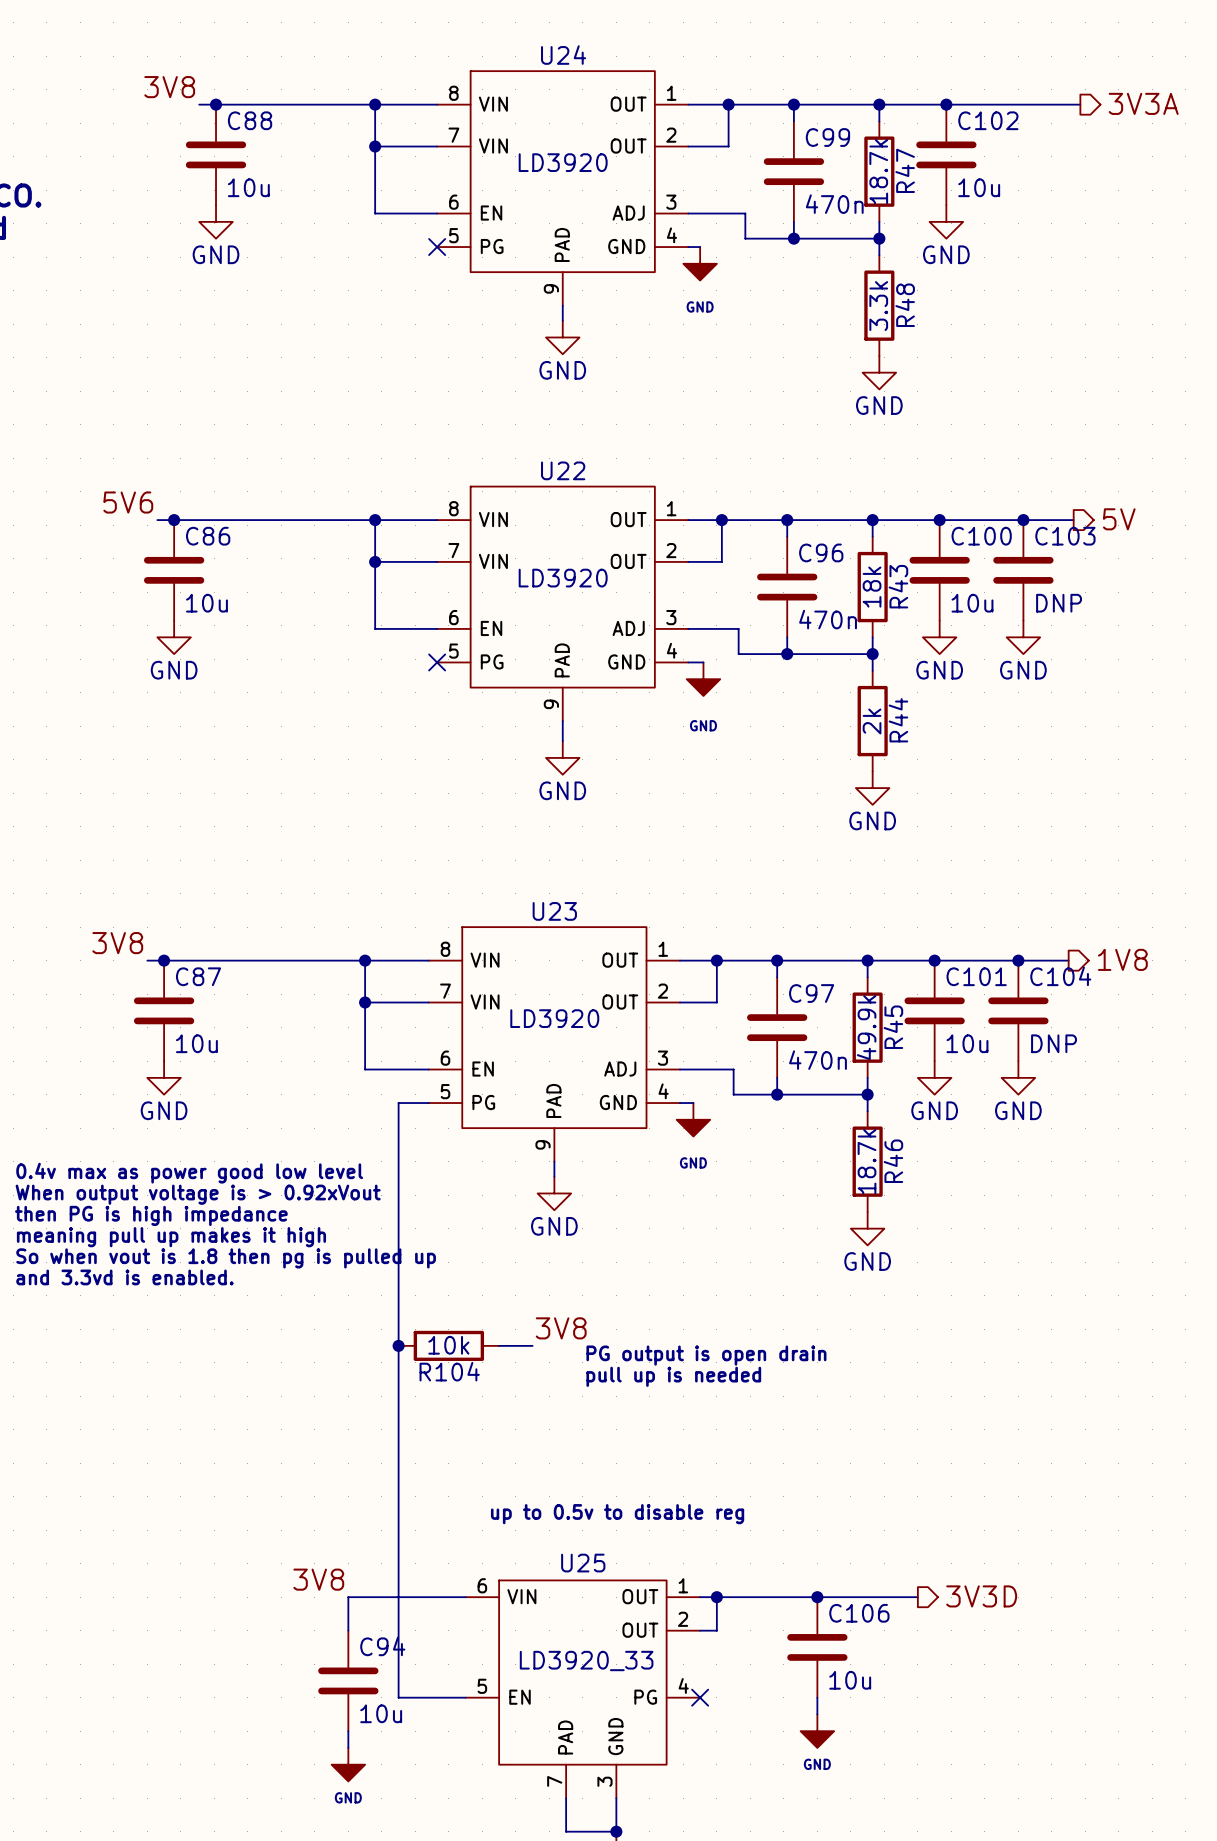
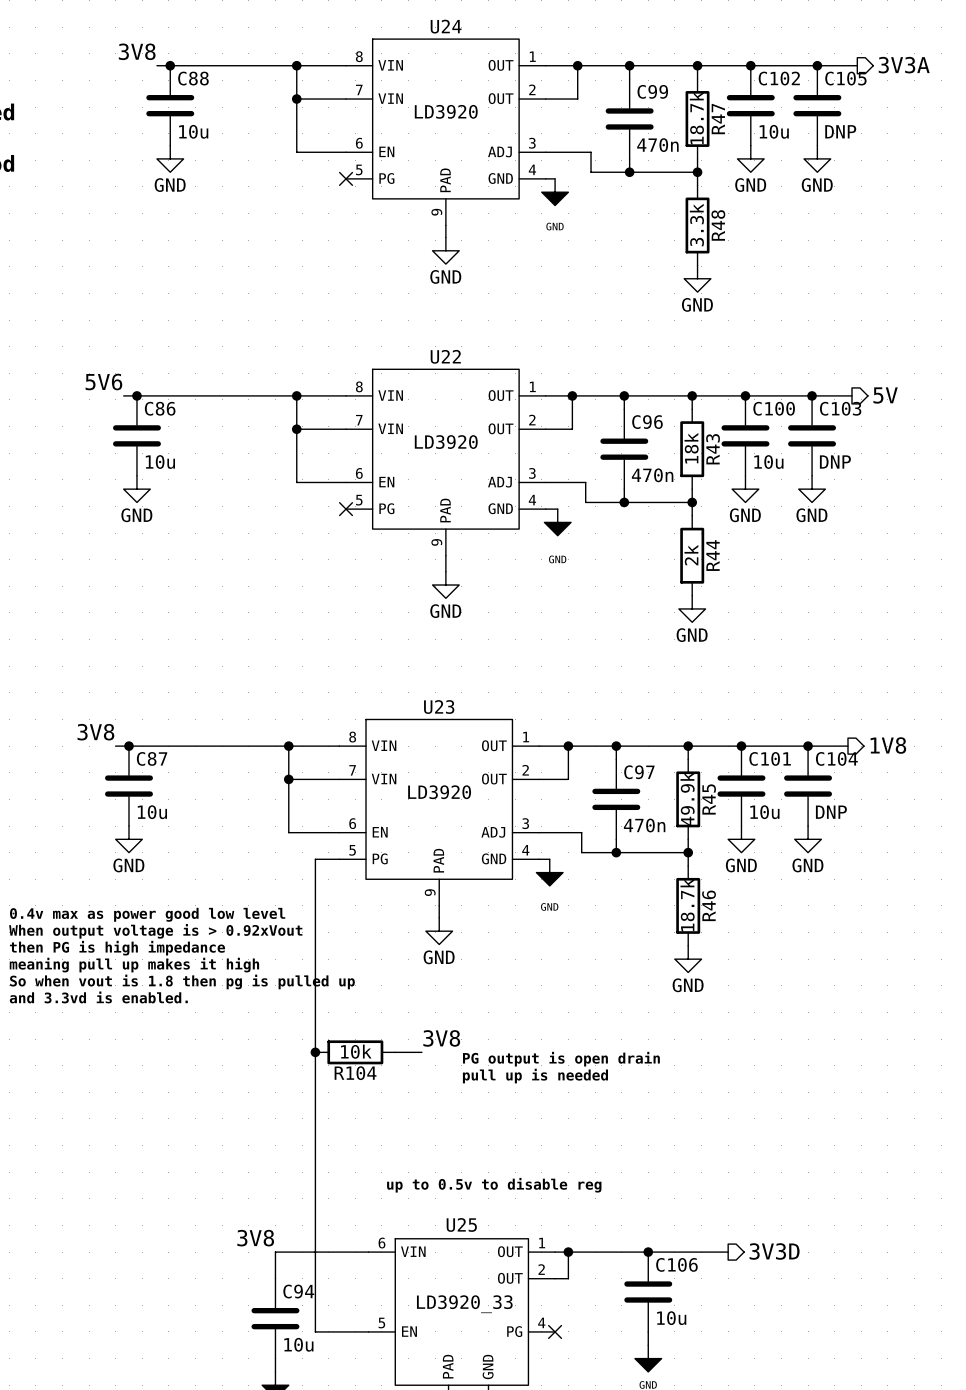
junction: none -> (817, 65)
C105: none -> DNP (817, 105)
power symbol: none -> GND (817, 158)

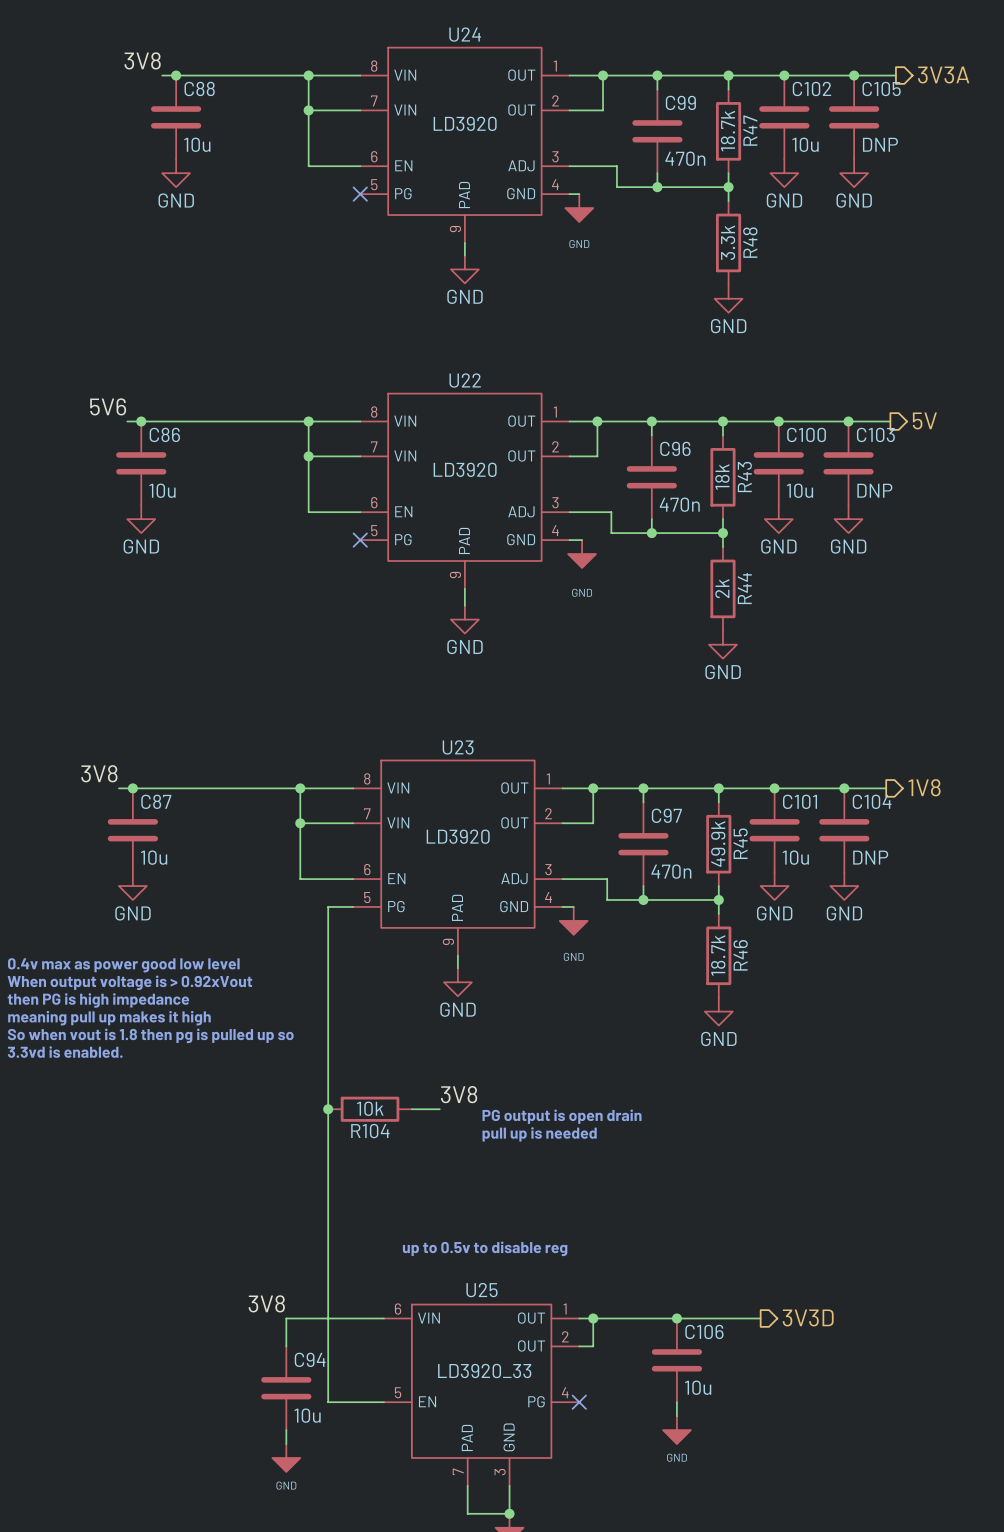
text: So when vout is 1.8 then pg is pulled up (182, 981) -> So when vout is 1.8 then pg is pulled up so (150, 1035)
text: and 3.3vd is enabled. (98, 997) -> 3.3vd is enabled. (65, 1052)

